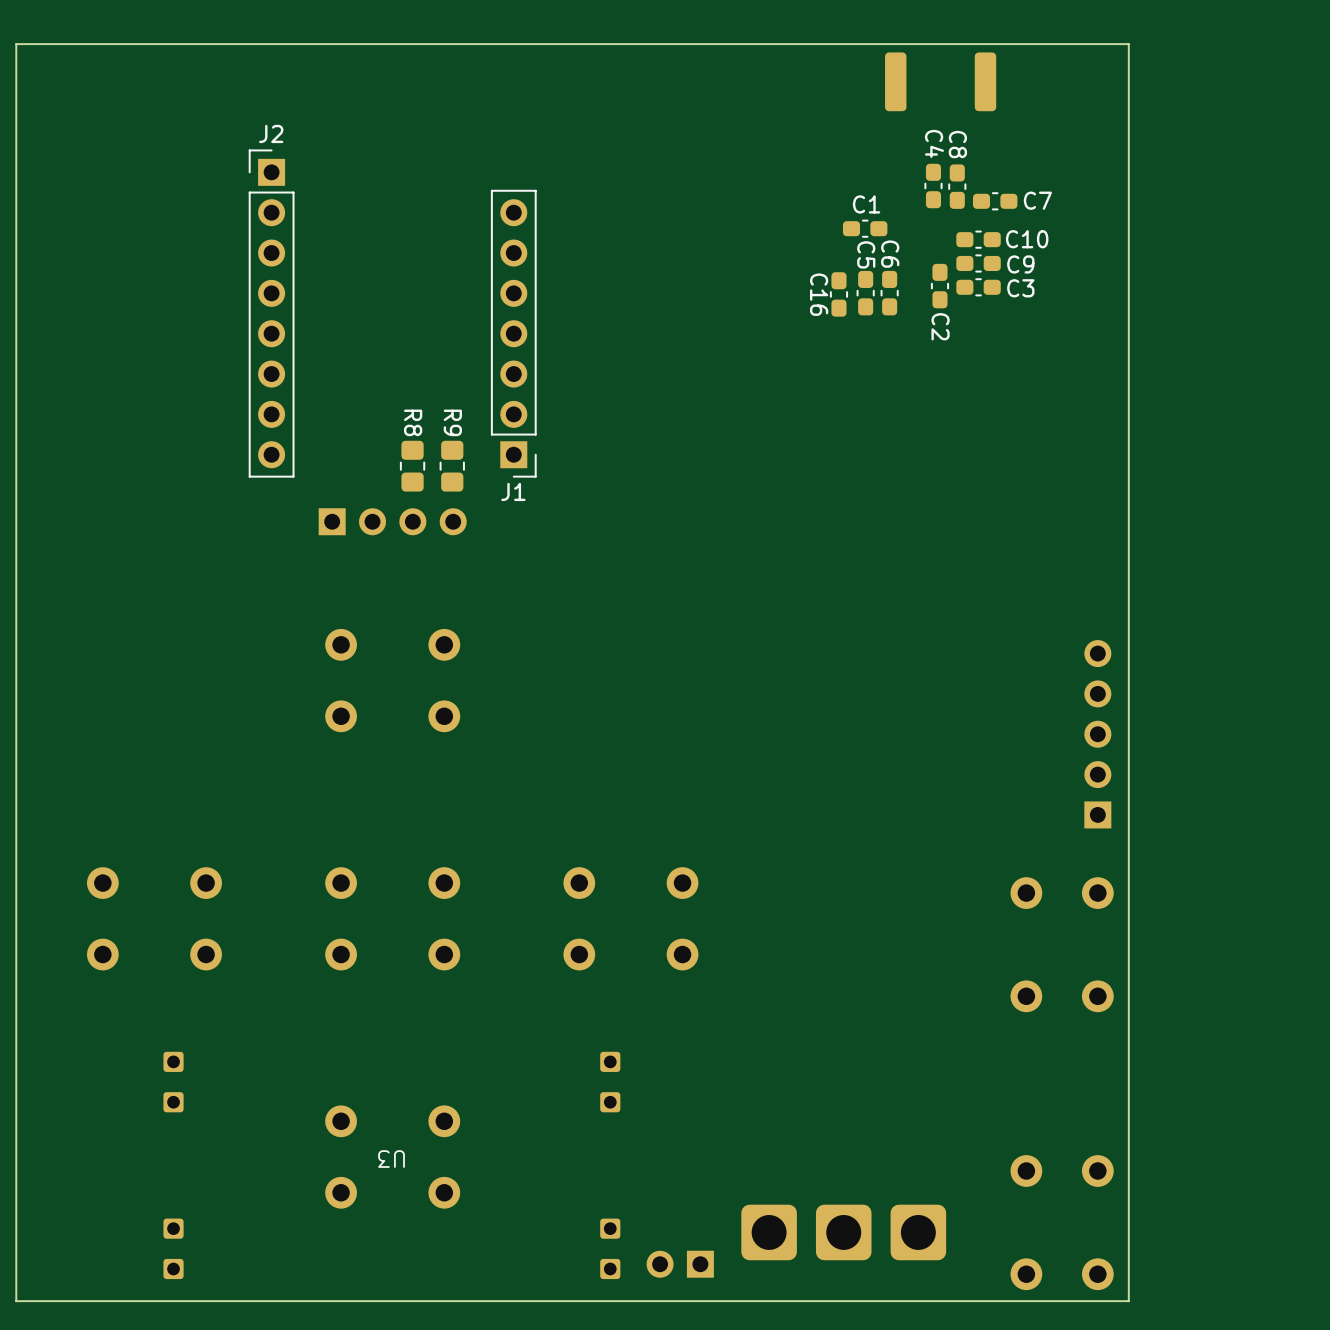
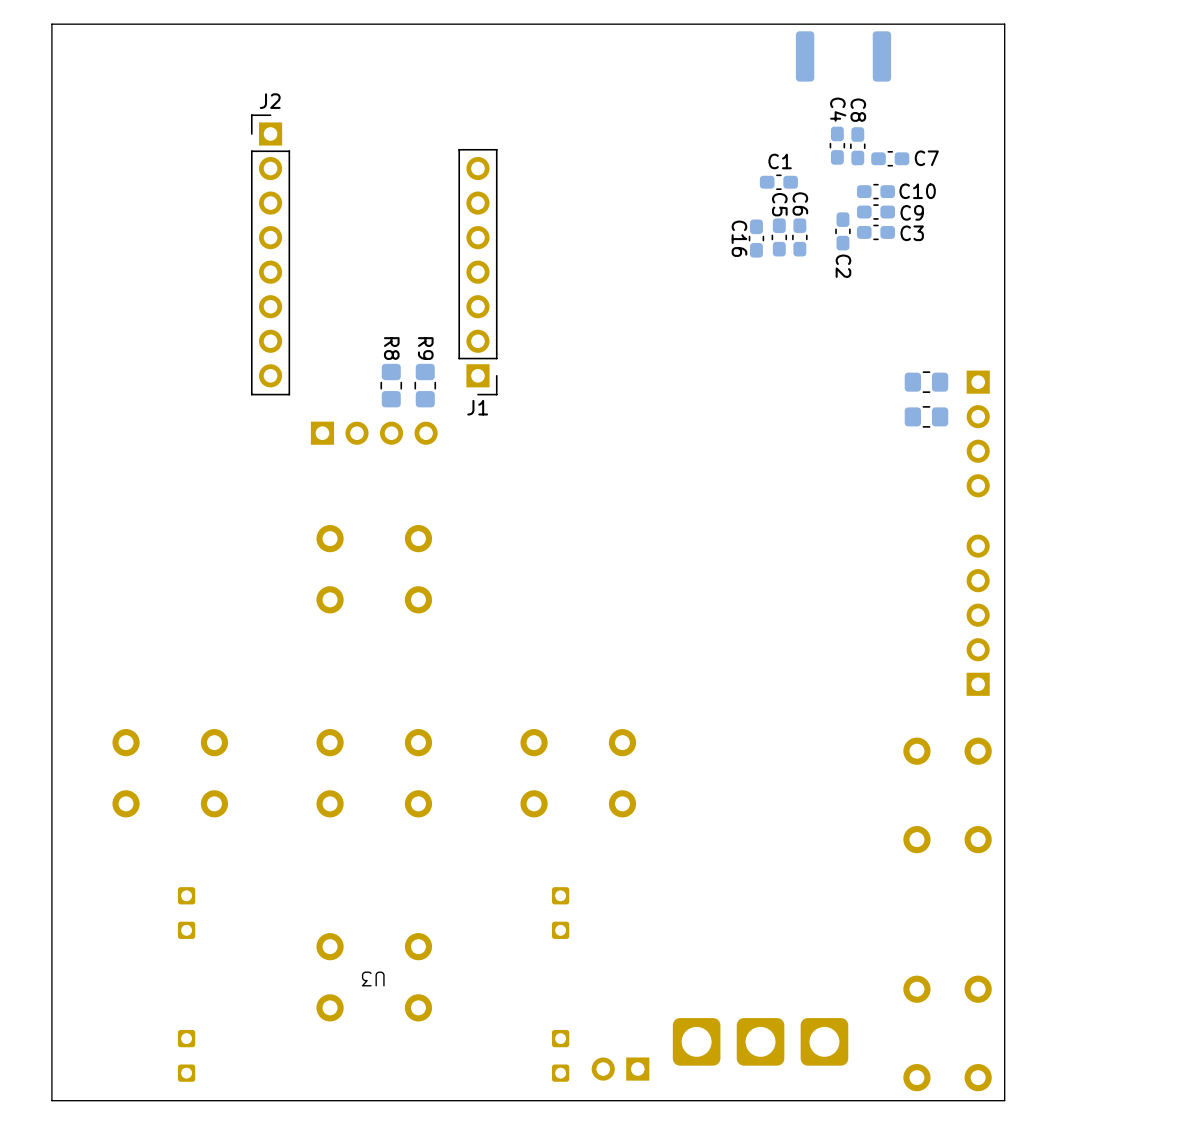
part: none -> (926, 382)
part: none -> (926, 416)
part: none -> (978, 433)

